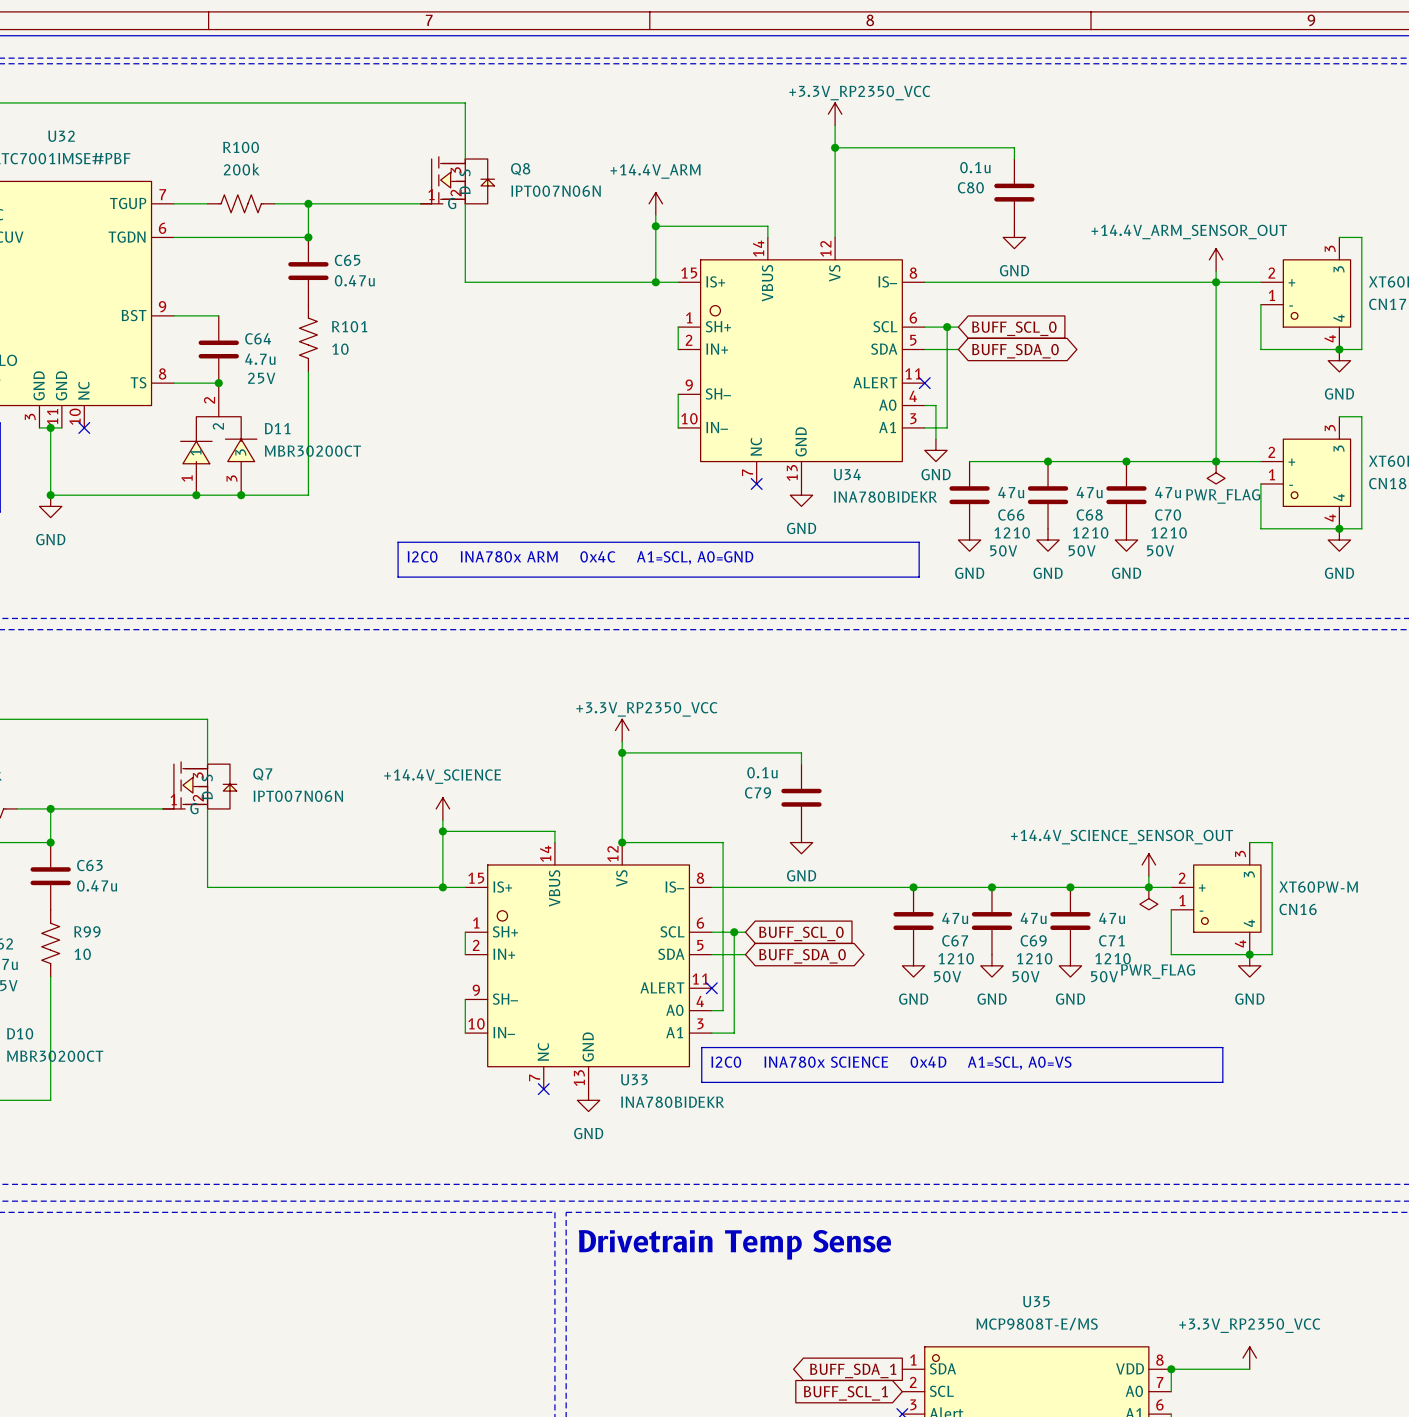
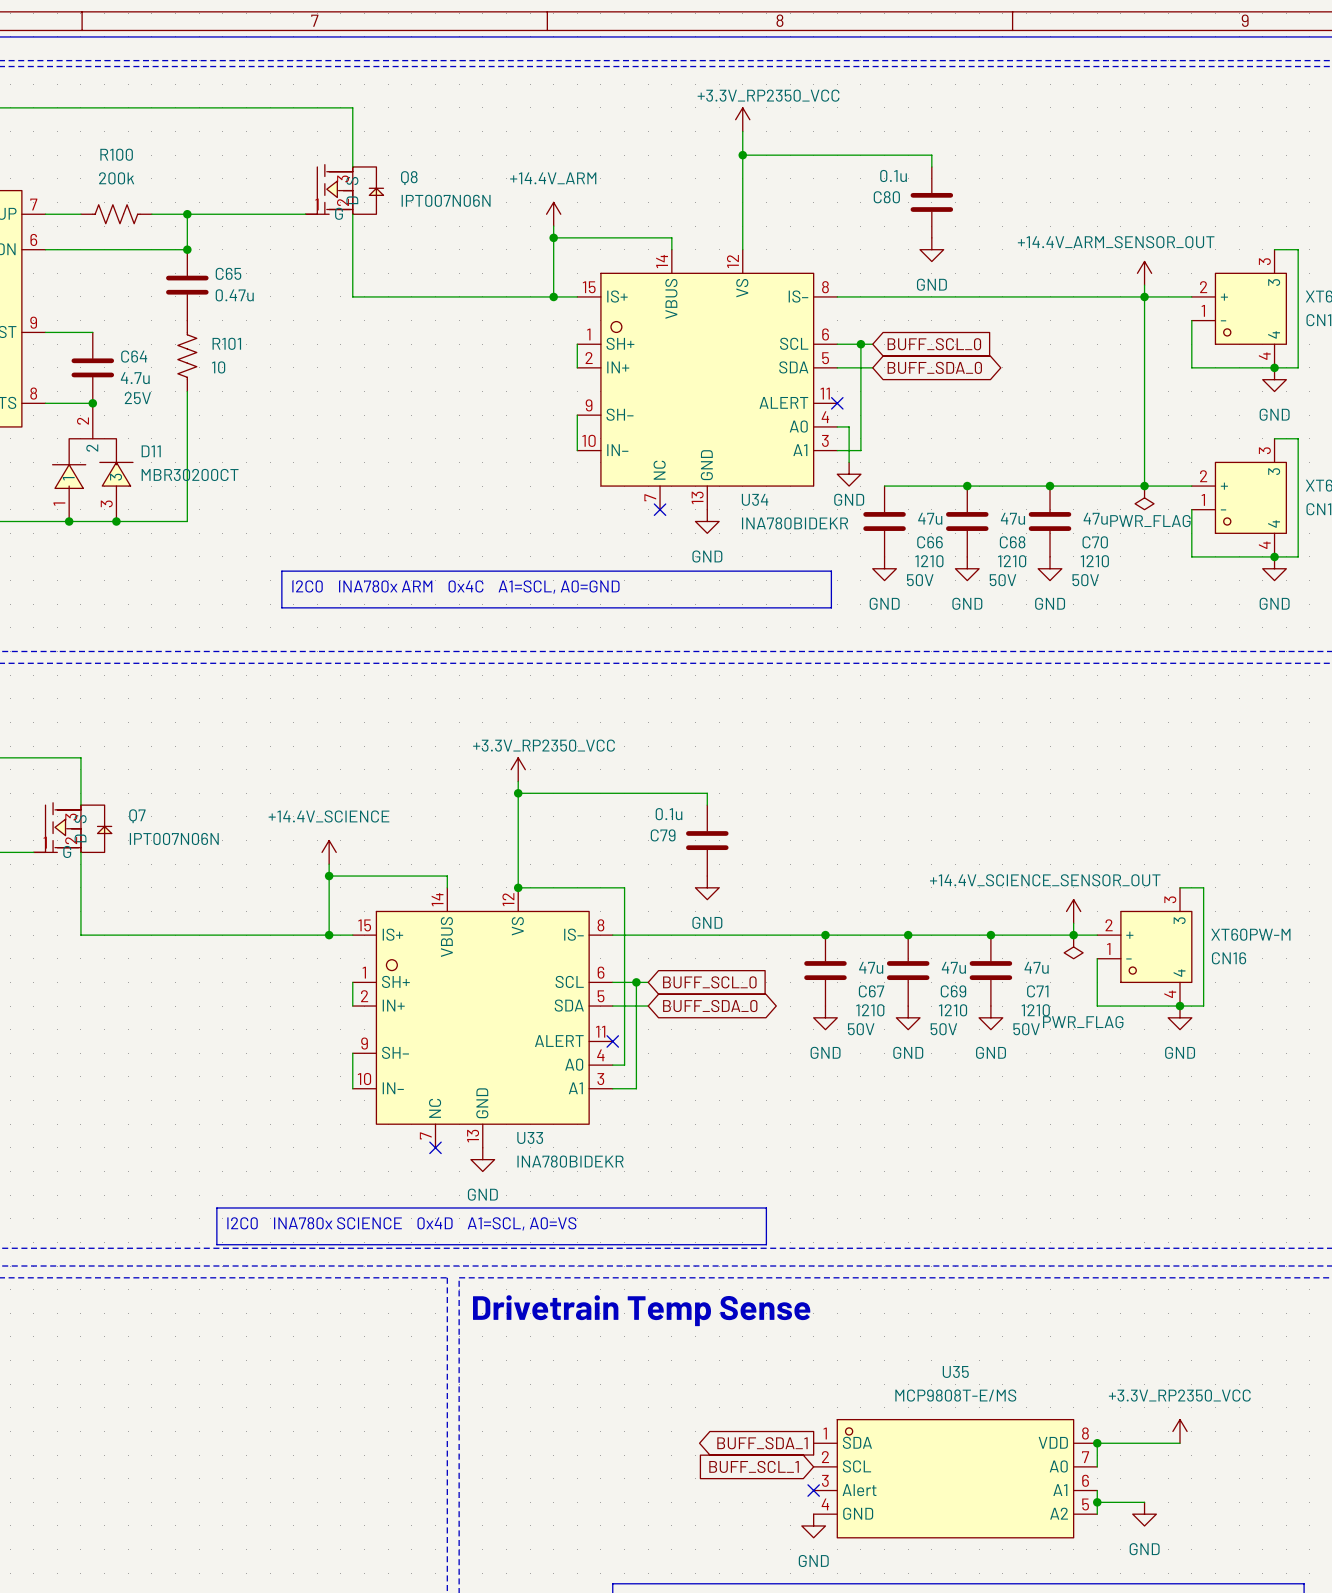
line: (701, 1047) (1222, 1047) (1222, 1082) (701, 1082) (701, 1047) -> none
text: I2C0 INA780x SCIENCE 0x4D A1=SCL, A0=VS (891, 1063) -> none
line: none -> (216, 1207) (766, 1207) (766, 1244) (216, 1244) (216, 1207)
text: none -> I2C0 INA780x SCIENCE 0x4D A1=SCL, A0=VS (401, 1223)

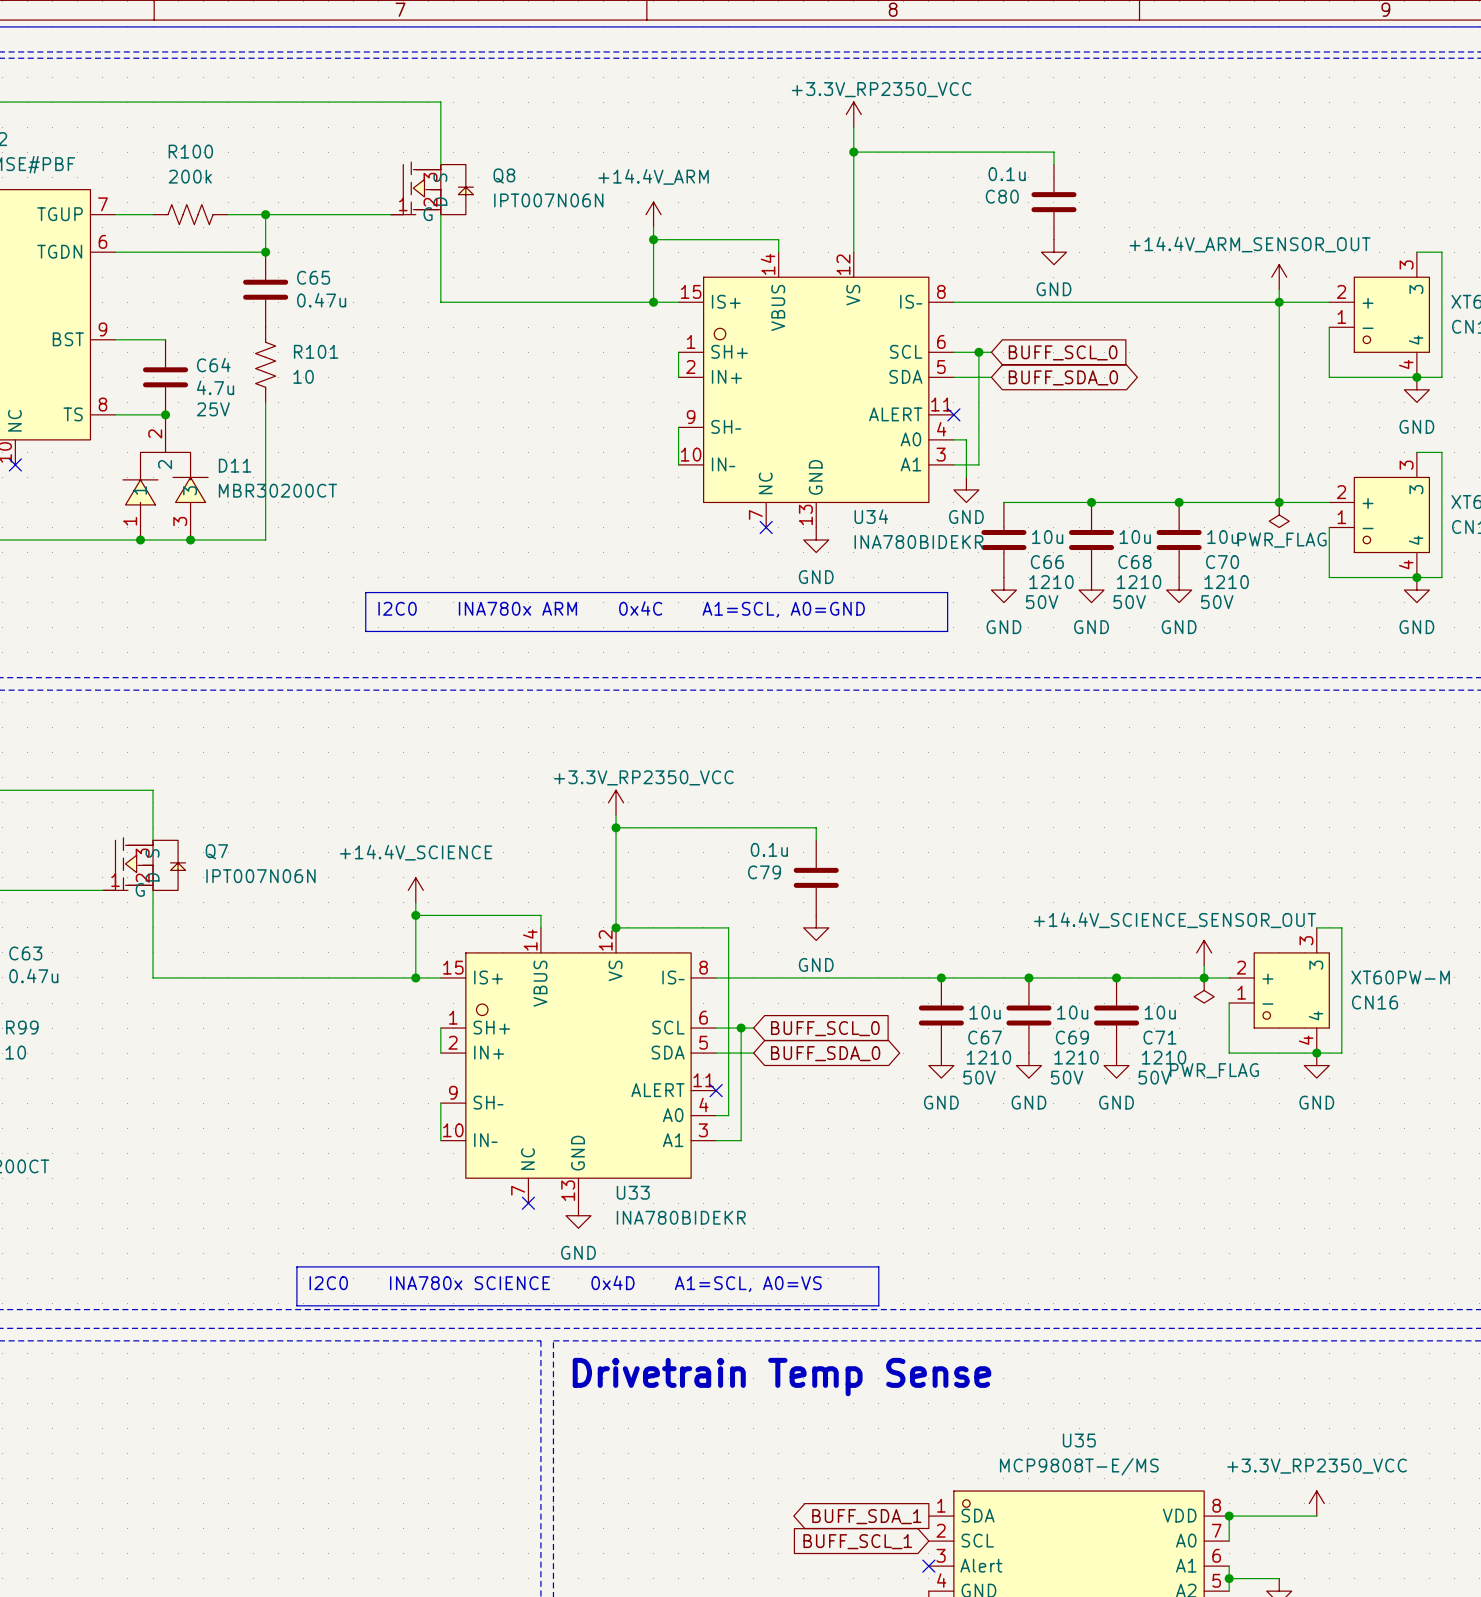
C66 value: 47u (930, 518) -> 10u (1047, 537)
C68 value: 47u (1012, 518) -> 10u (1135, 537)
C70 value: 47u (1095, 518) -> 10u (1222, 537)
C67 value: 47u (871, 967) -> 10u (985, 1012)
C69 value: 47u (953, 967) -> 10u (1072, 1012)
C71 value: 47u (1036, 967) -> 10u (1160, 1012)

